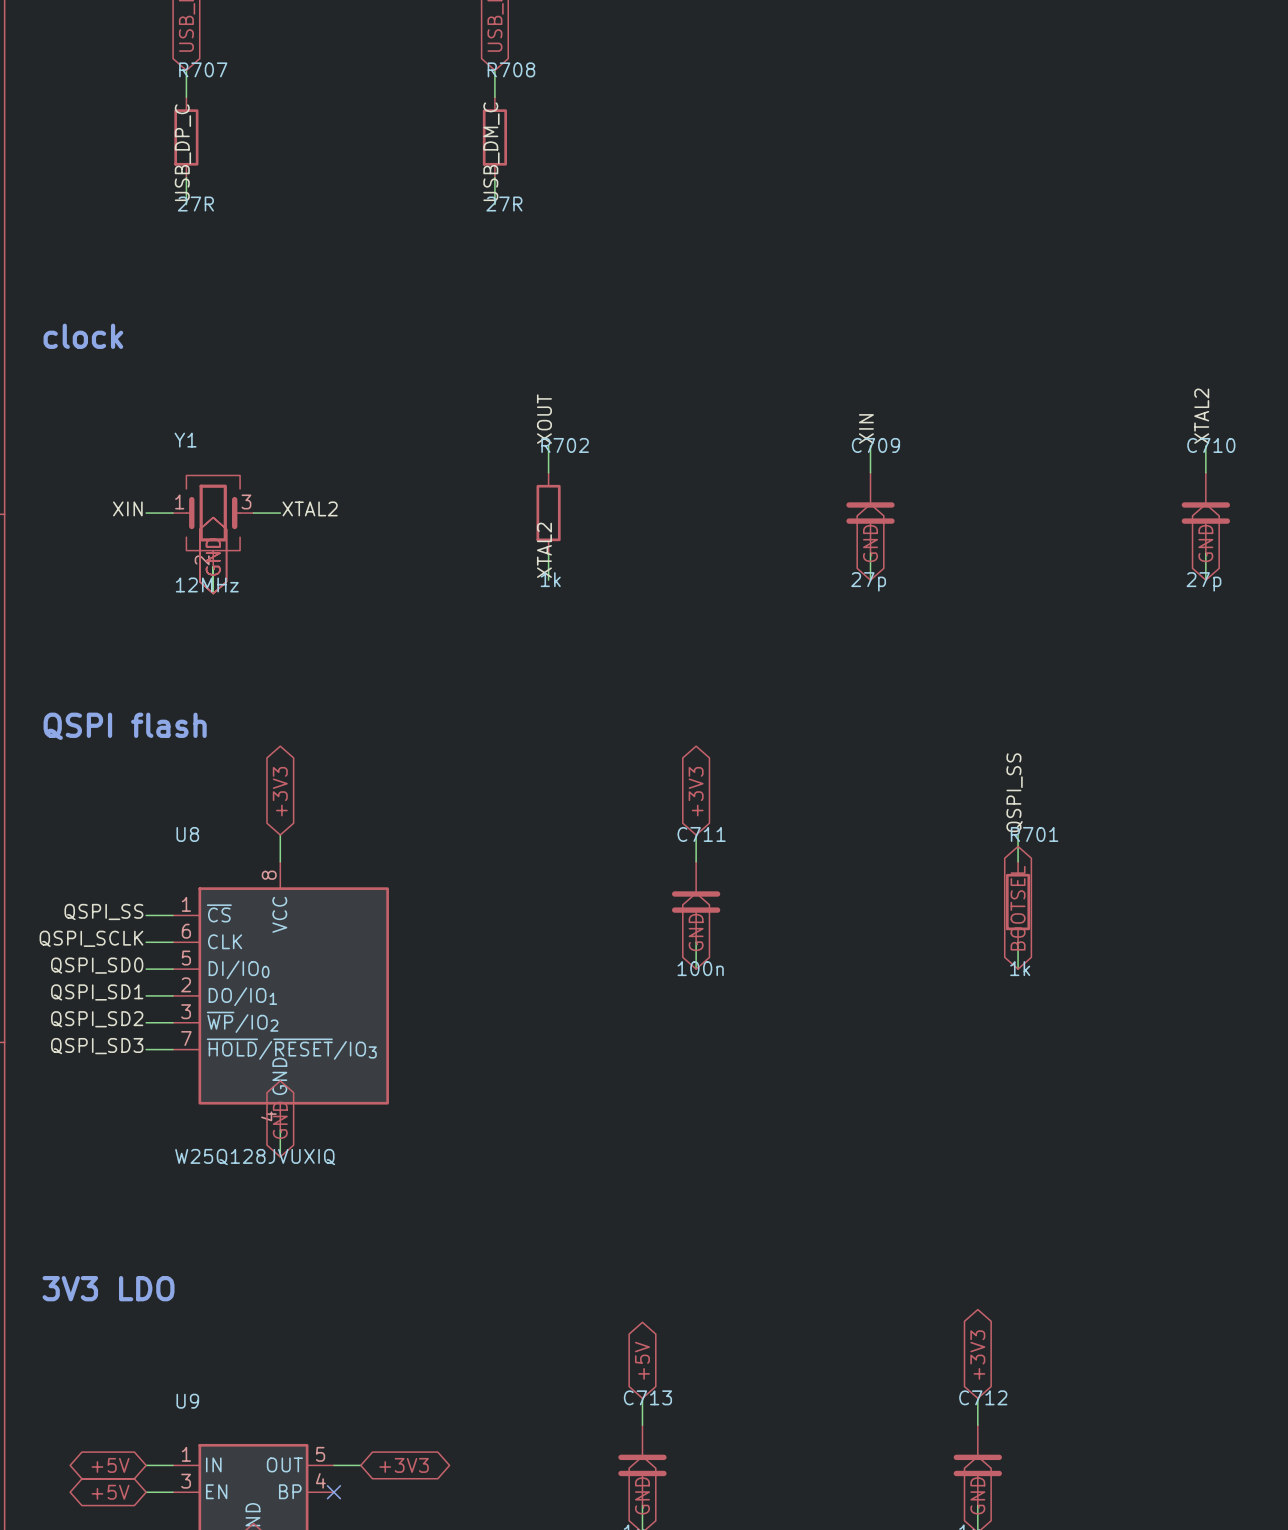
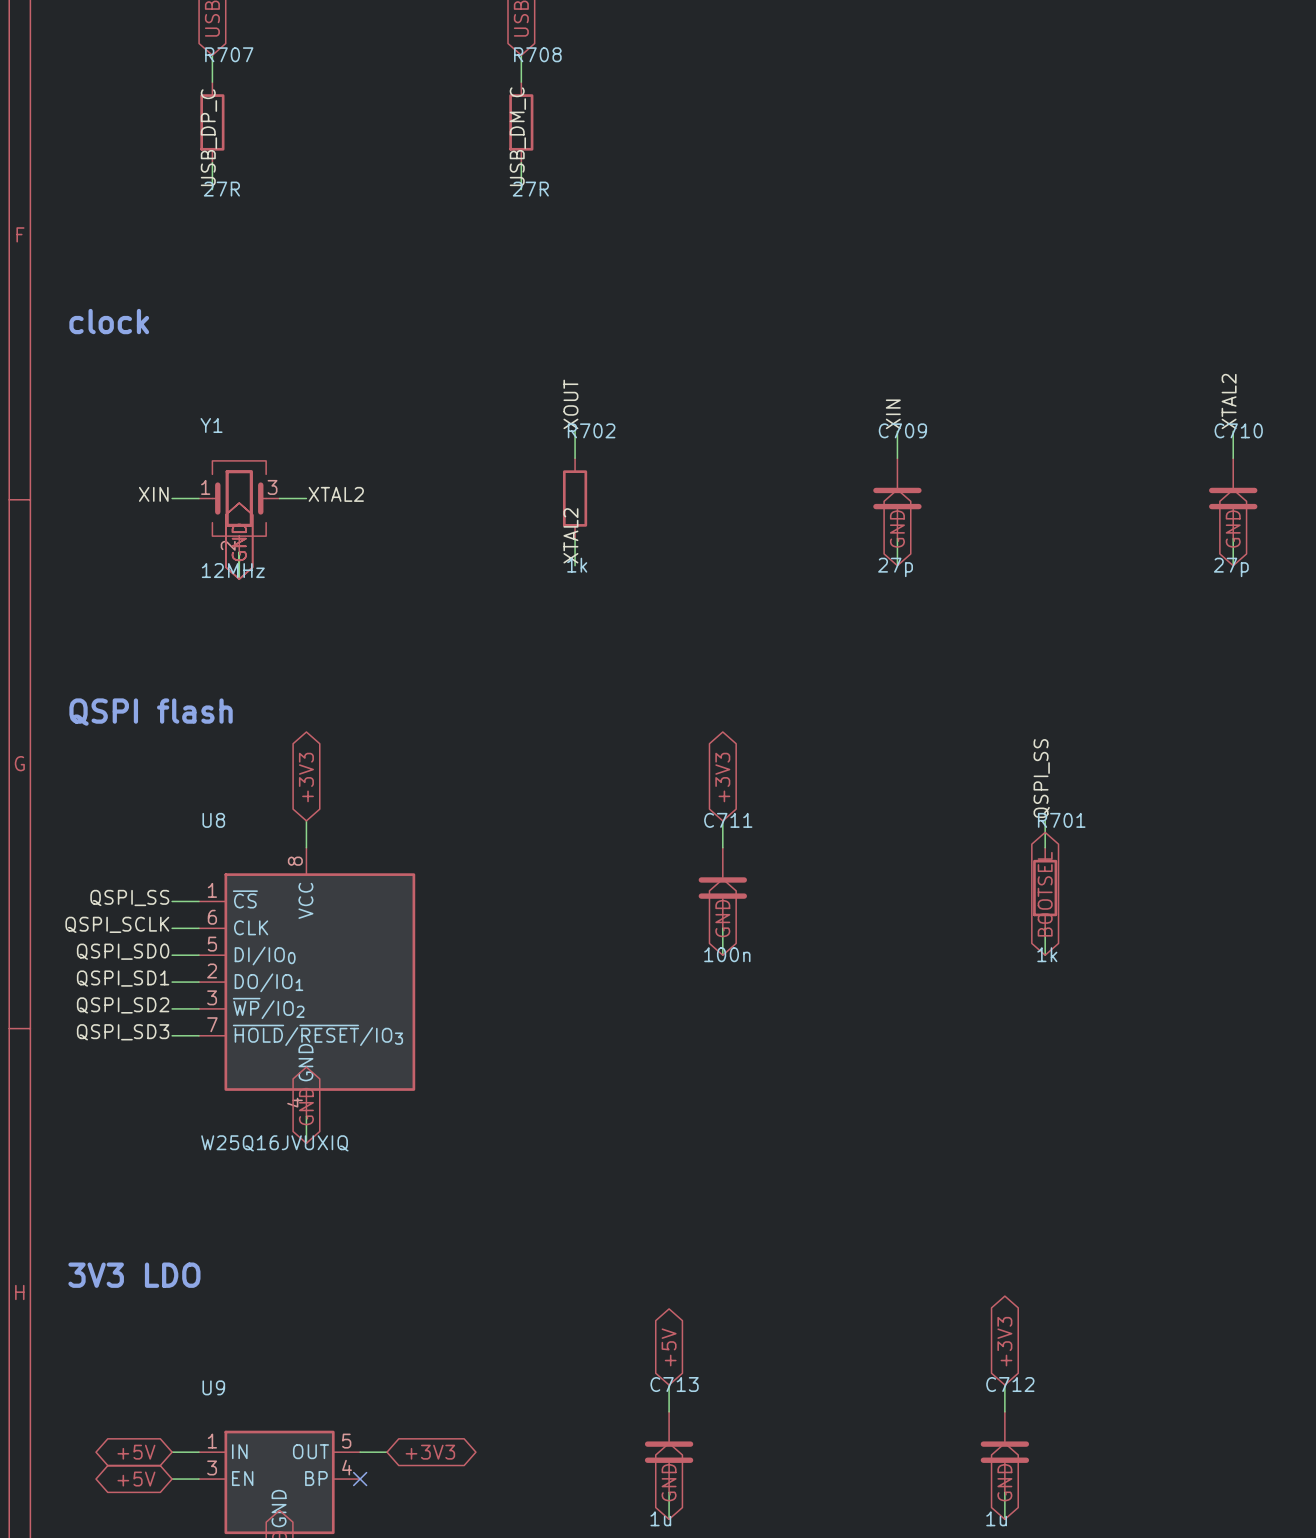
U8 value: W25Q128JVUXIQ (255, 1157) -> W25Q16JVUXIQ (274, 1143)

